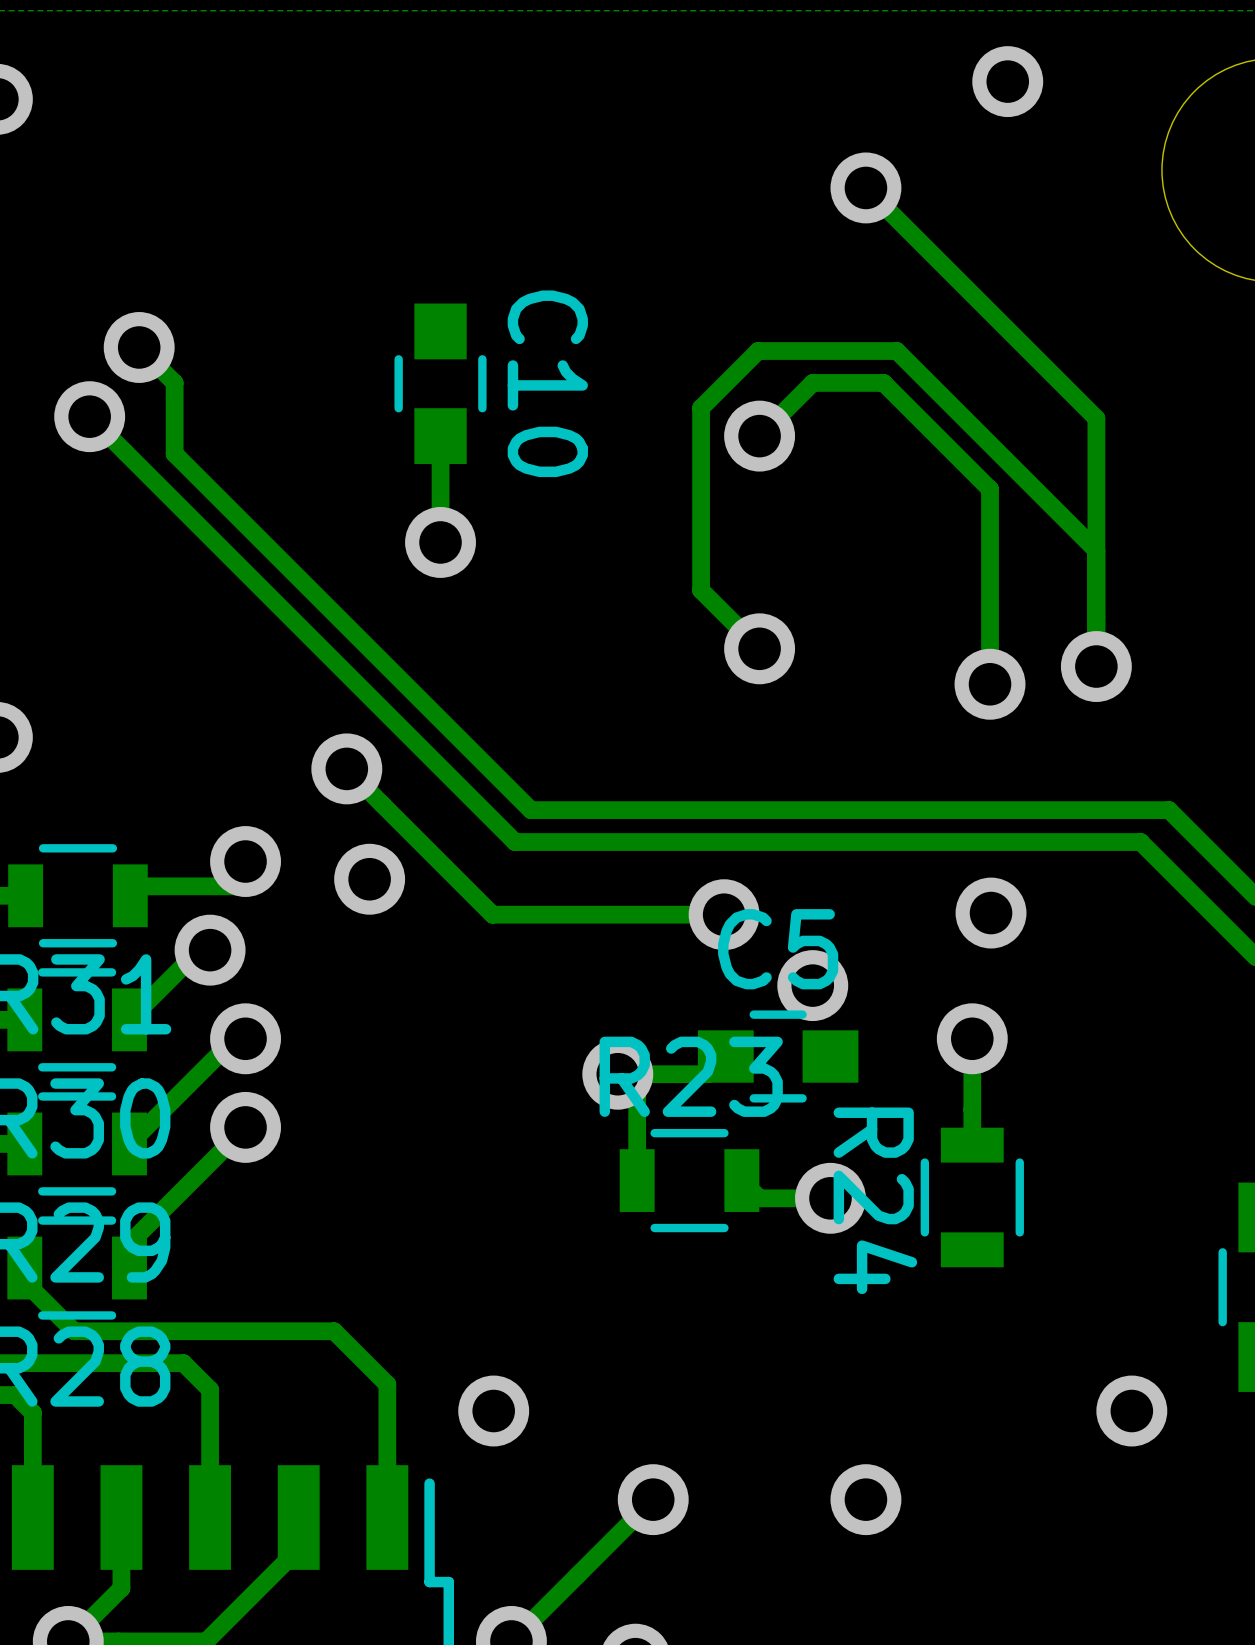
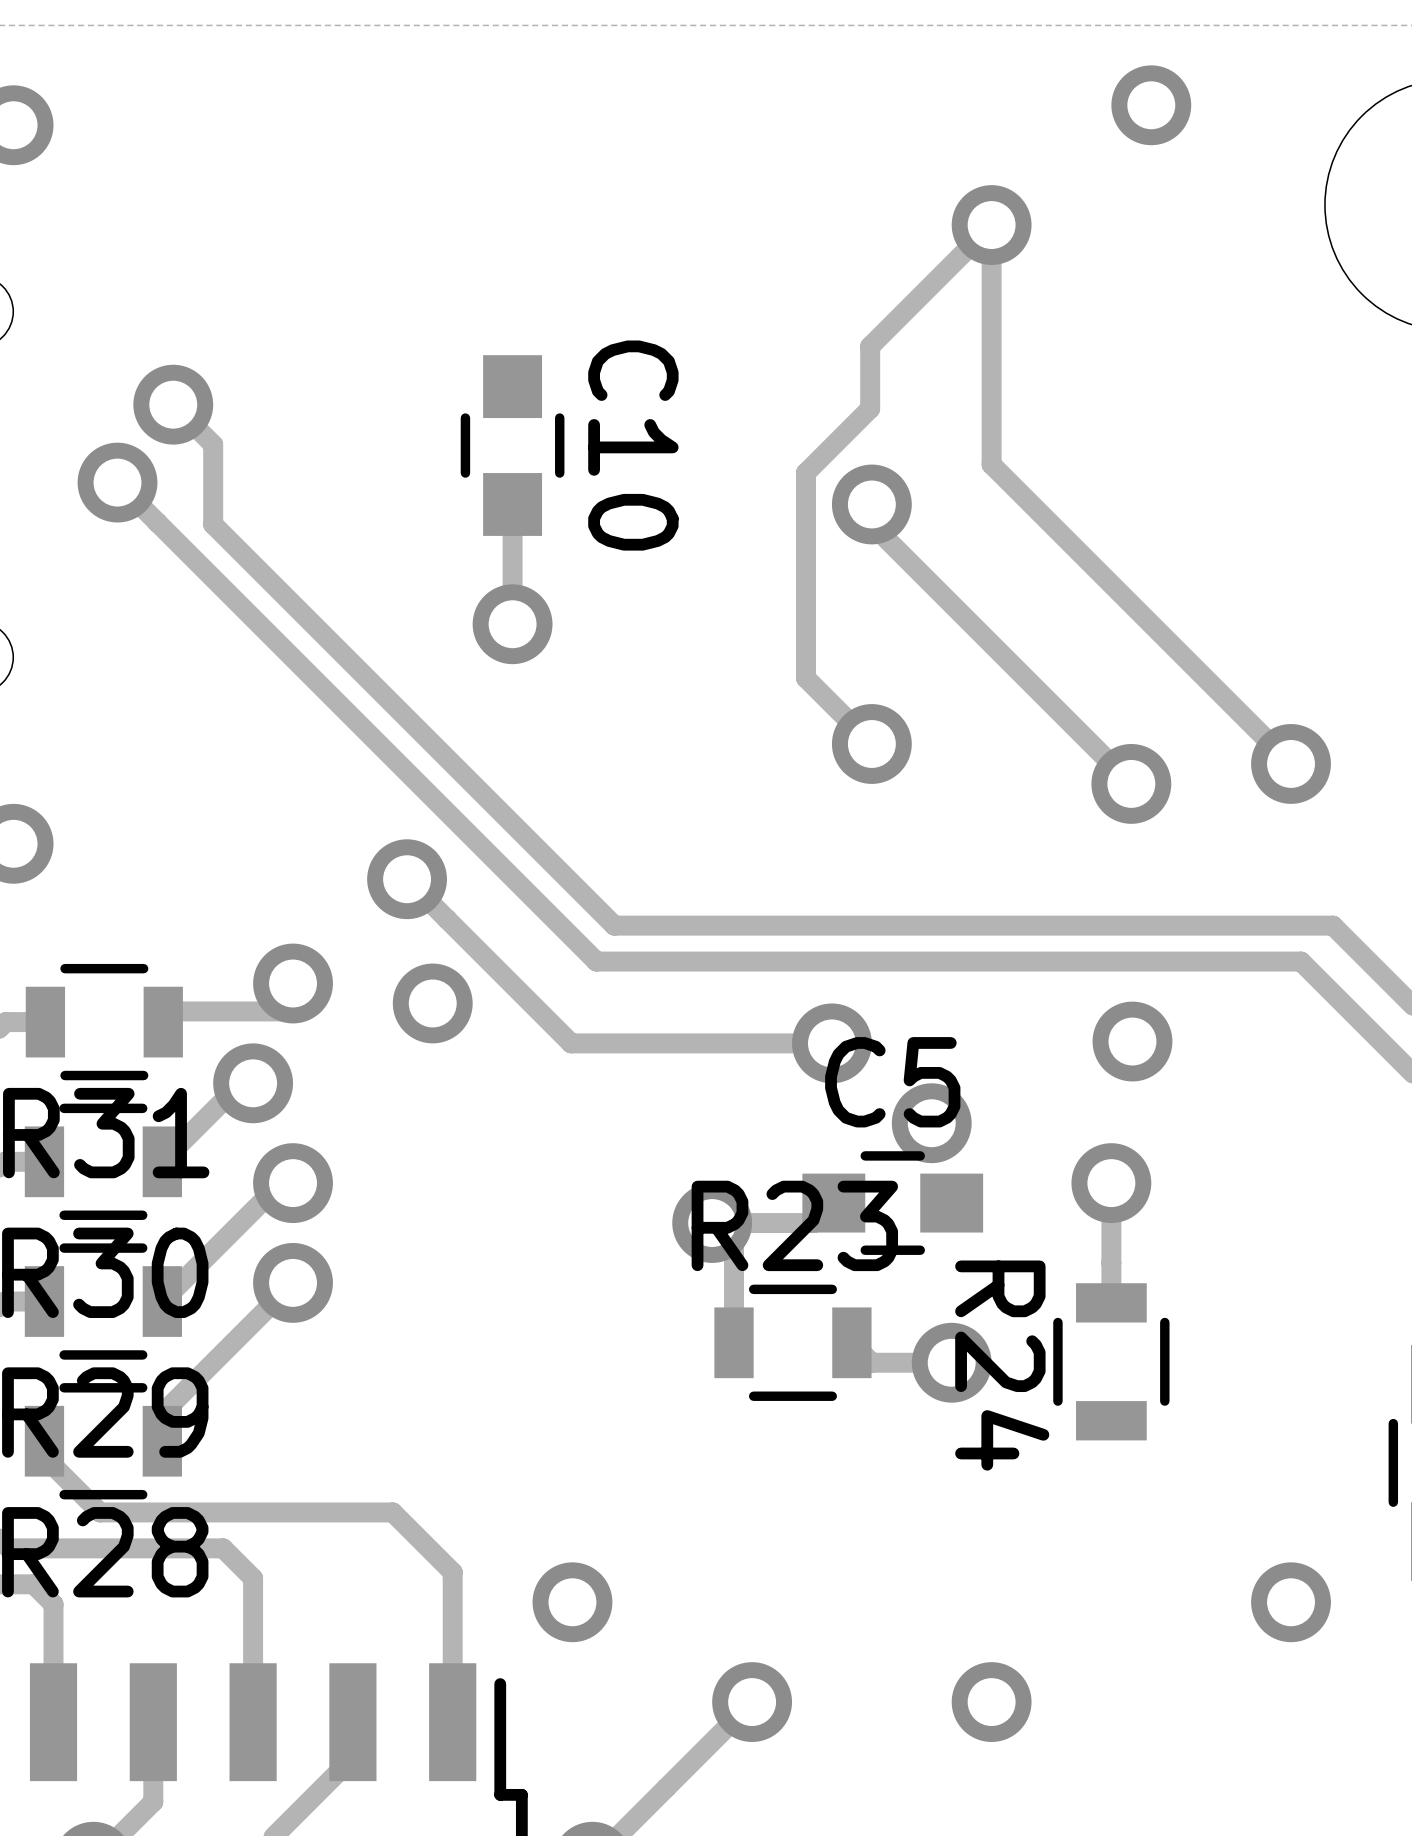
track: (865, 187) (1096, 418) (1096, 666) -> none
track: (758, 351) (896, 351) (1096, 550) -> (870, 408) (870, 346) (991, 225) (991, 464) (1291, 763)
track: (759, 436) (812, 382) (883, 382) (990, 489) (990, 684) -> (871, 504) (871, 524) (1131, 783)
via position: (1096, 666) -> (1291, 763)

